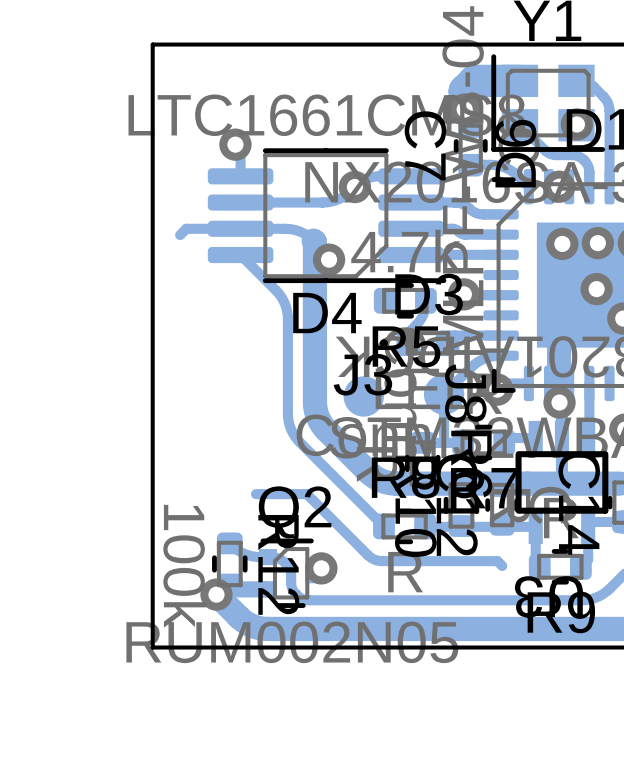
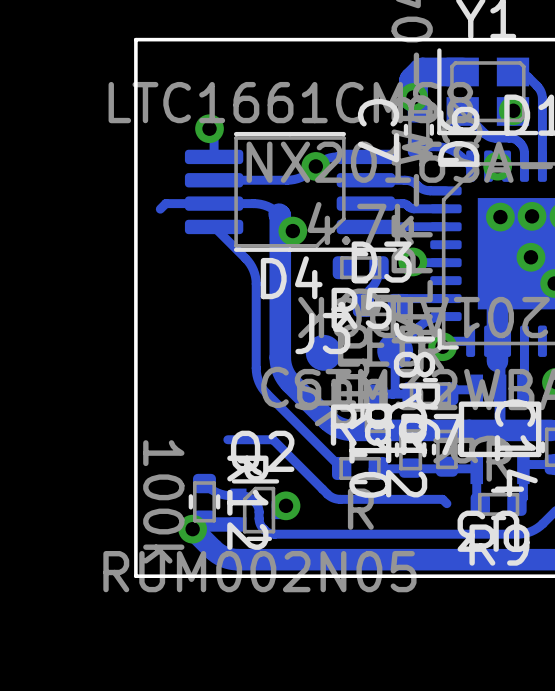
via: (559, 402) -> none

